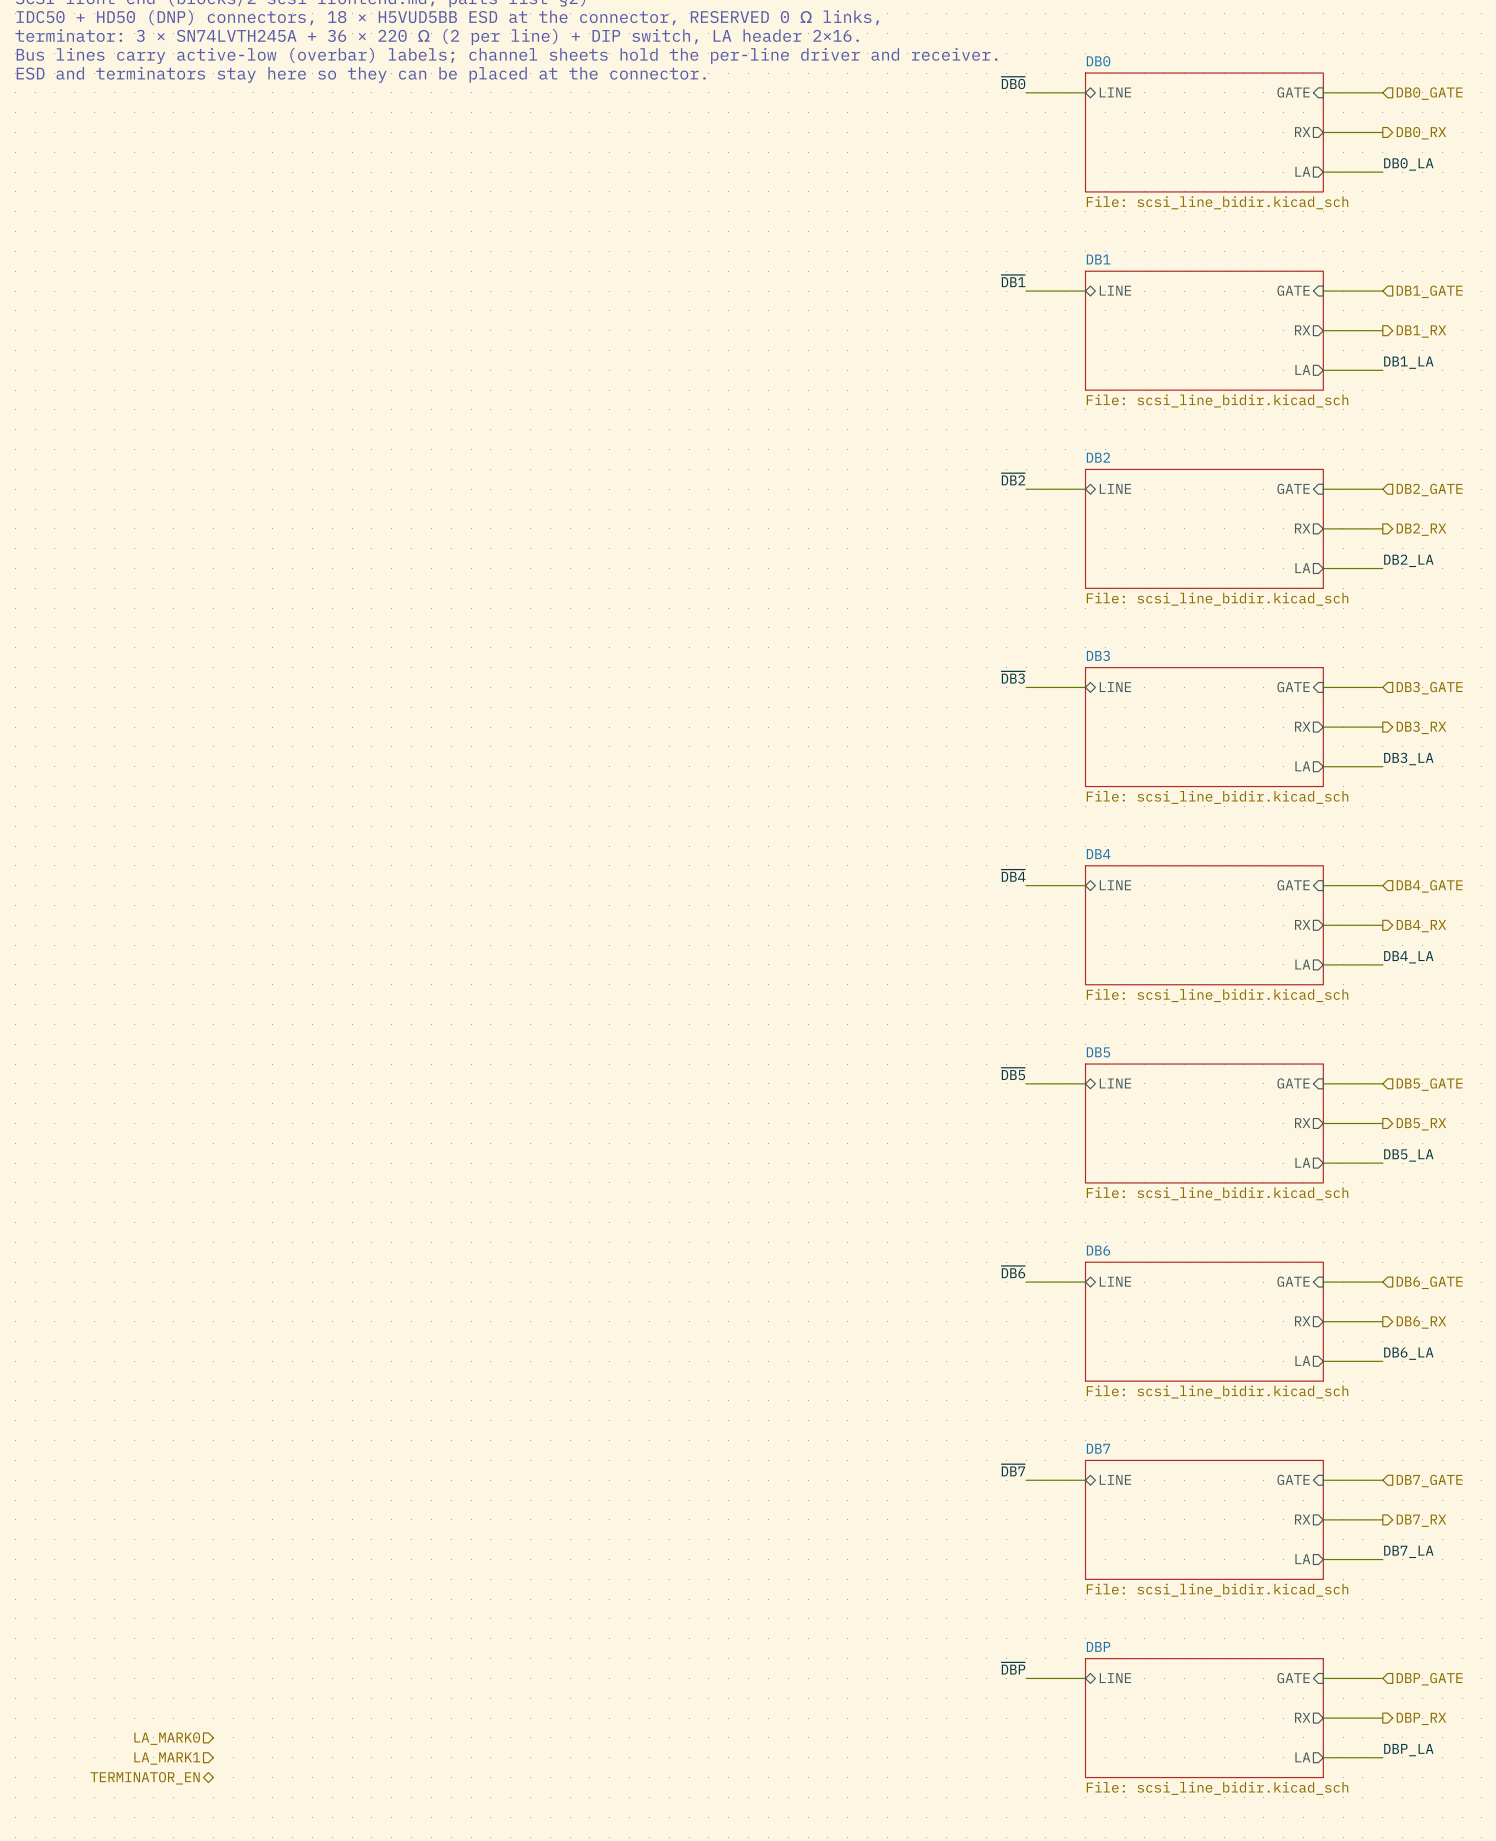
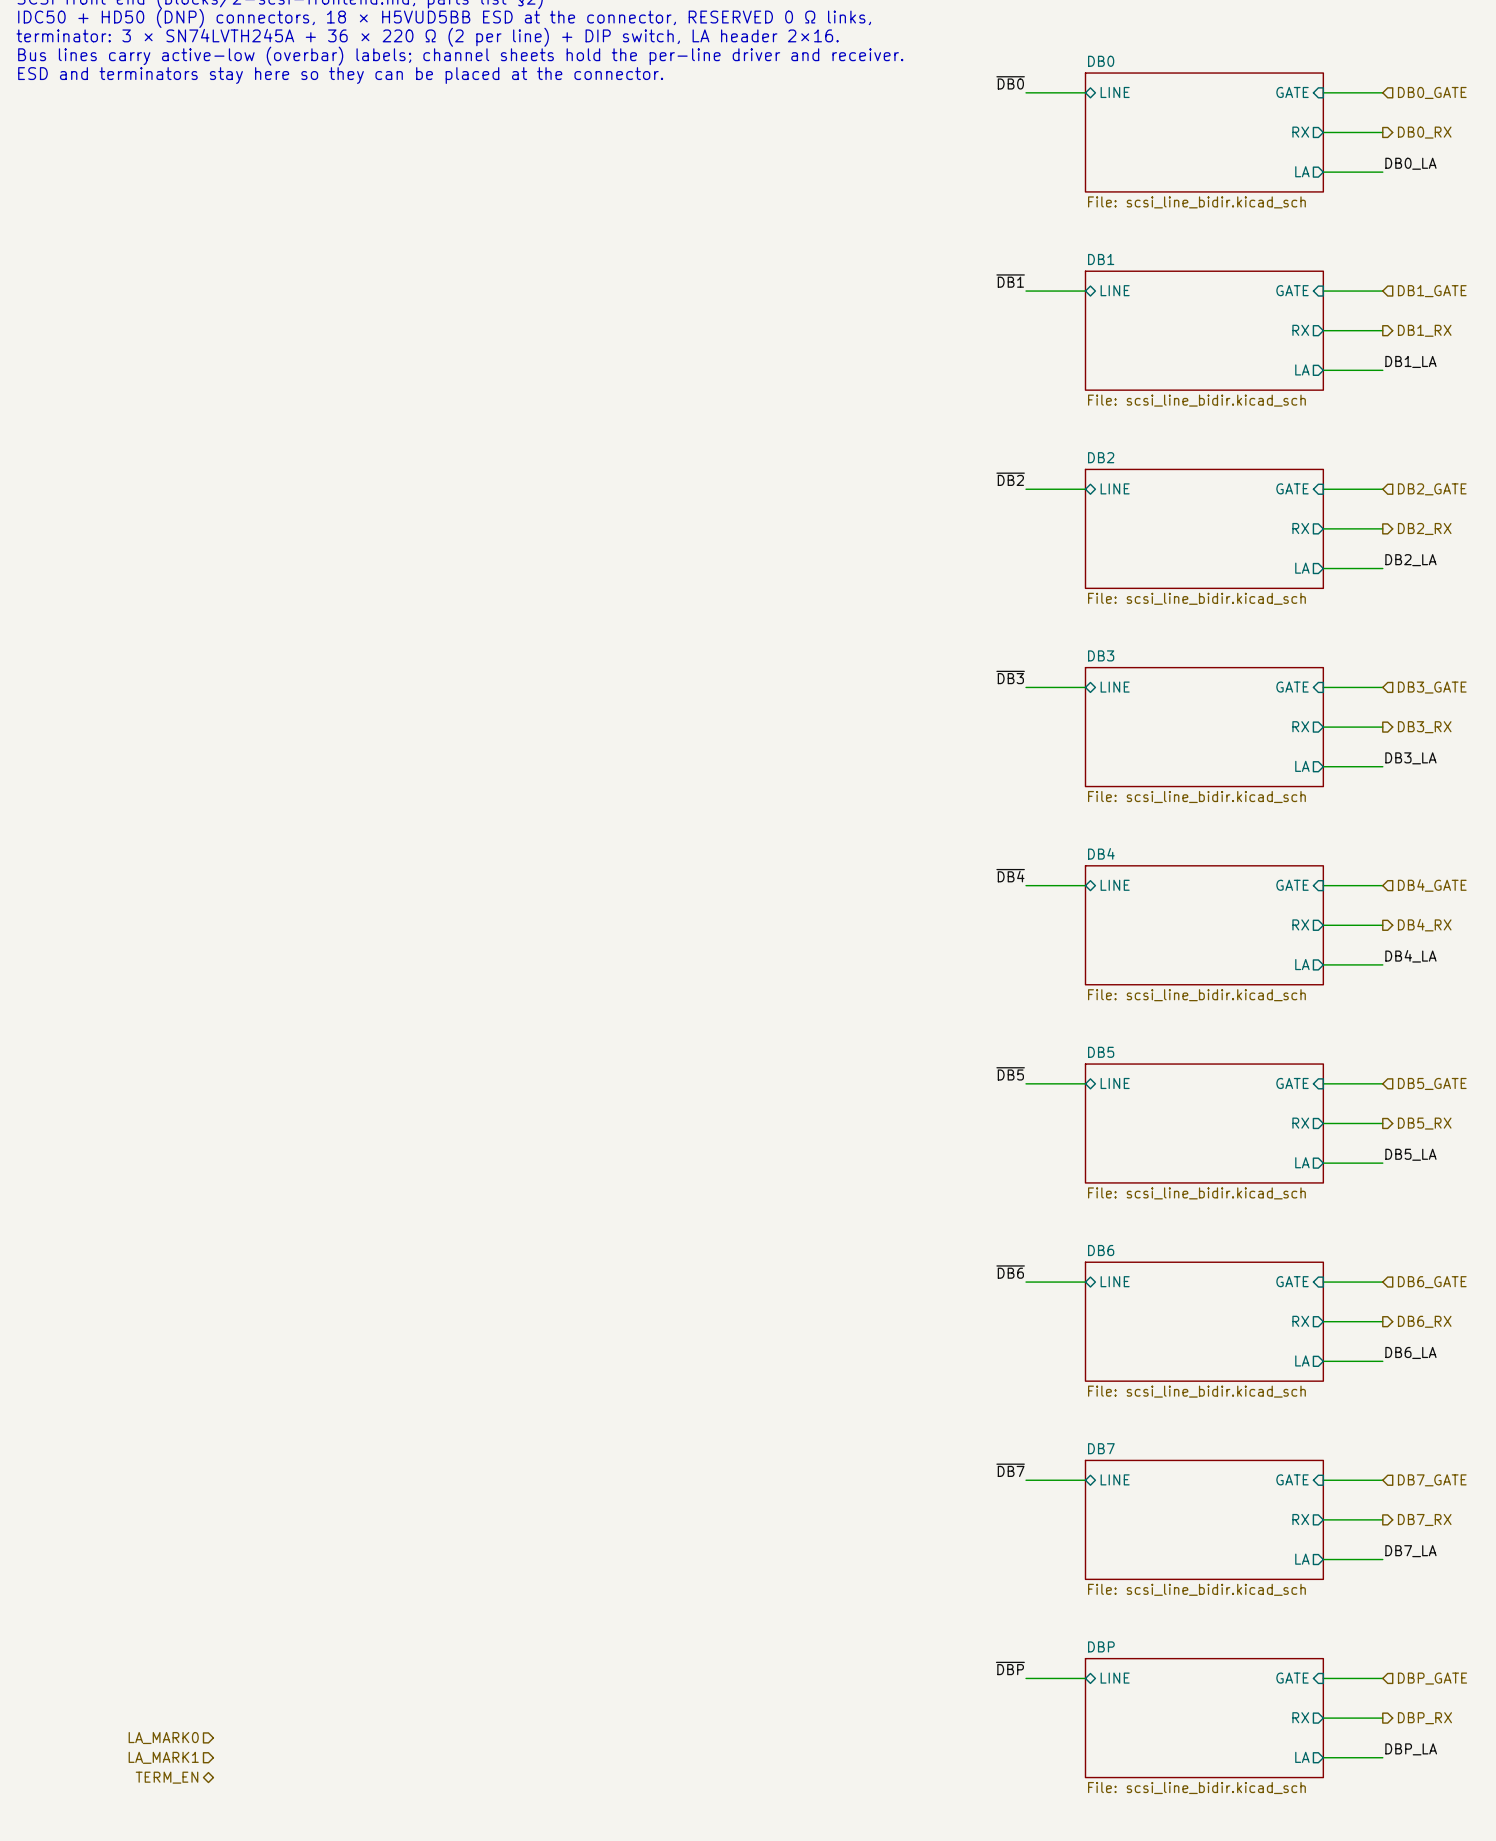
hierarchical label: TERMINATOR_EN (145, 1778) -> TERM_EN (167, 1777)

